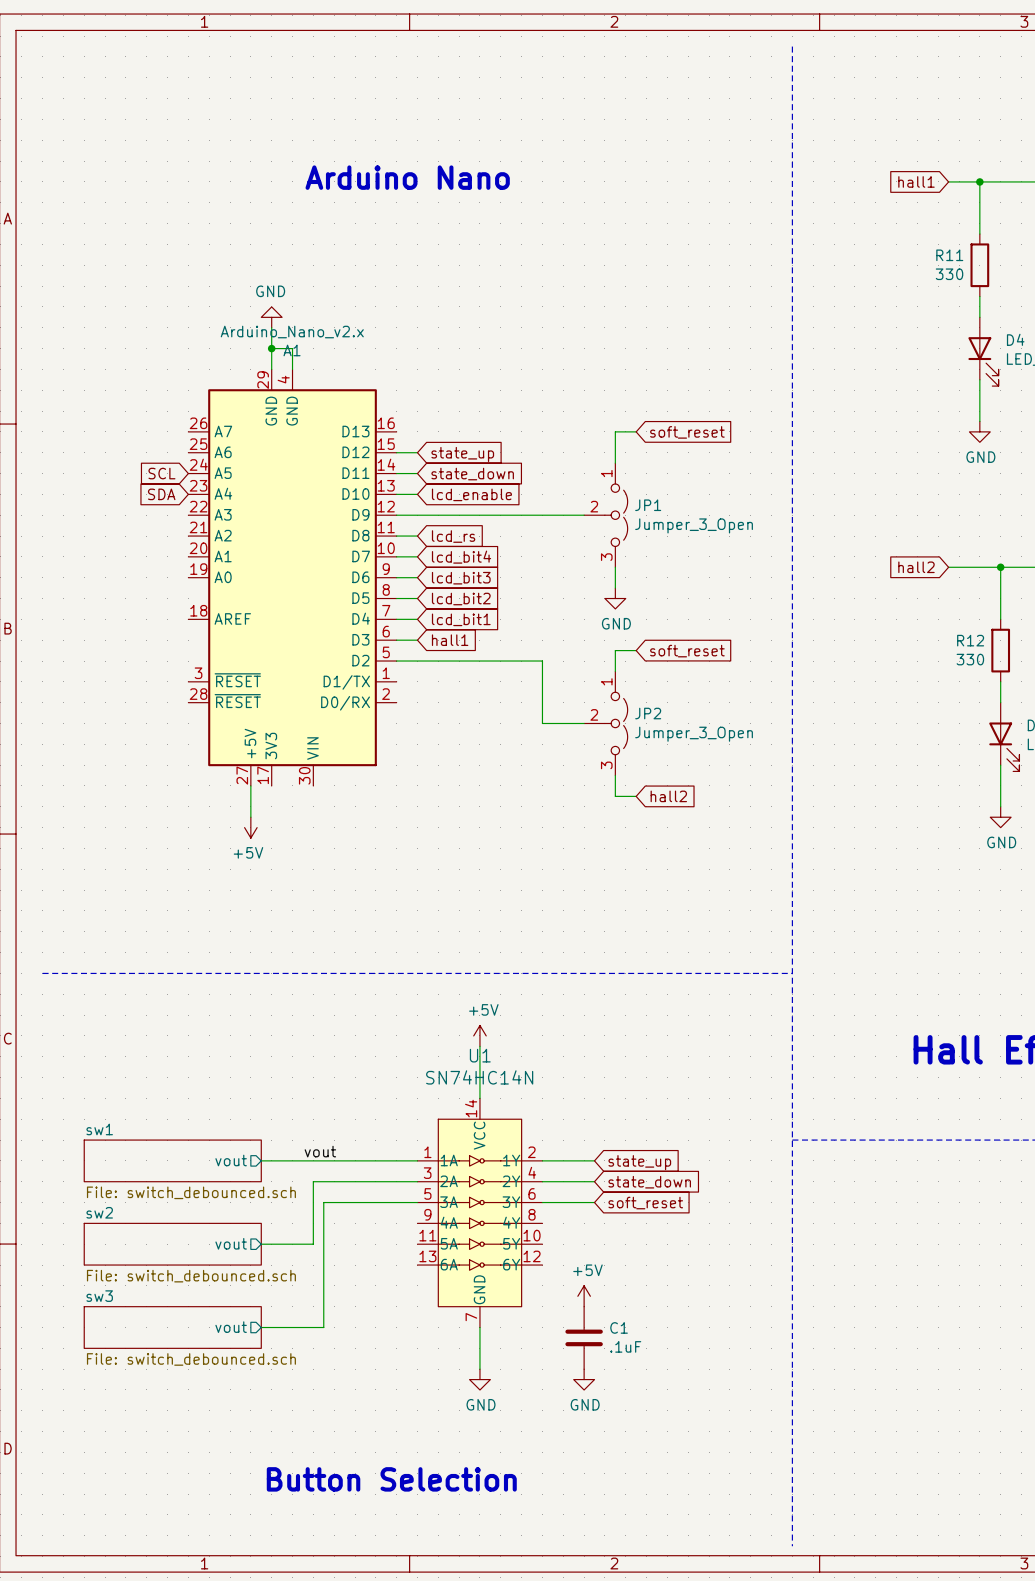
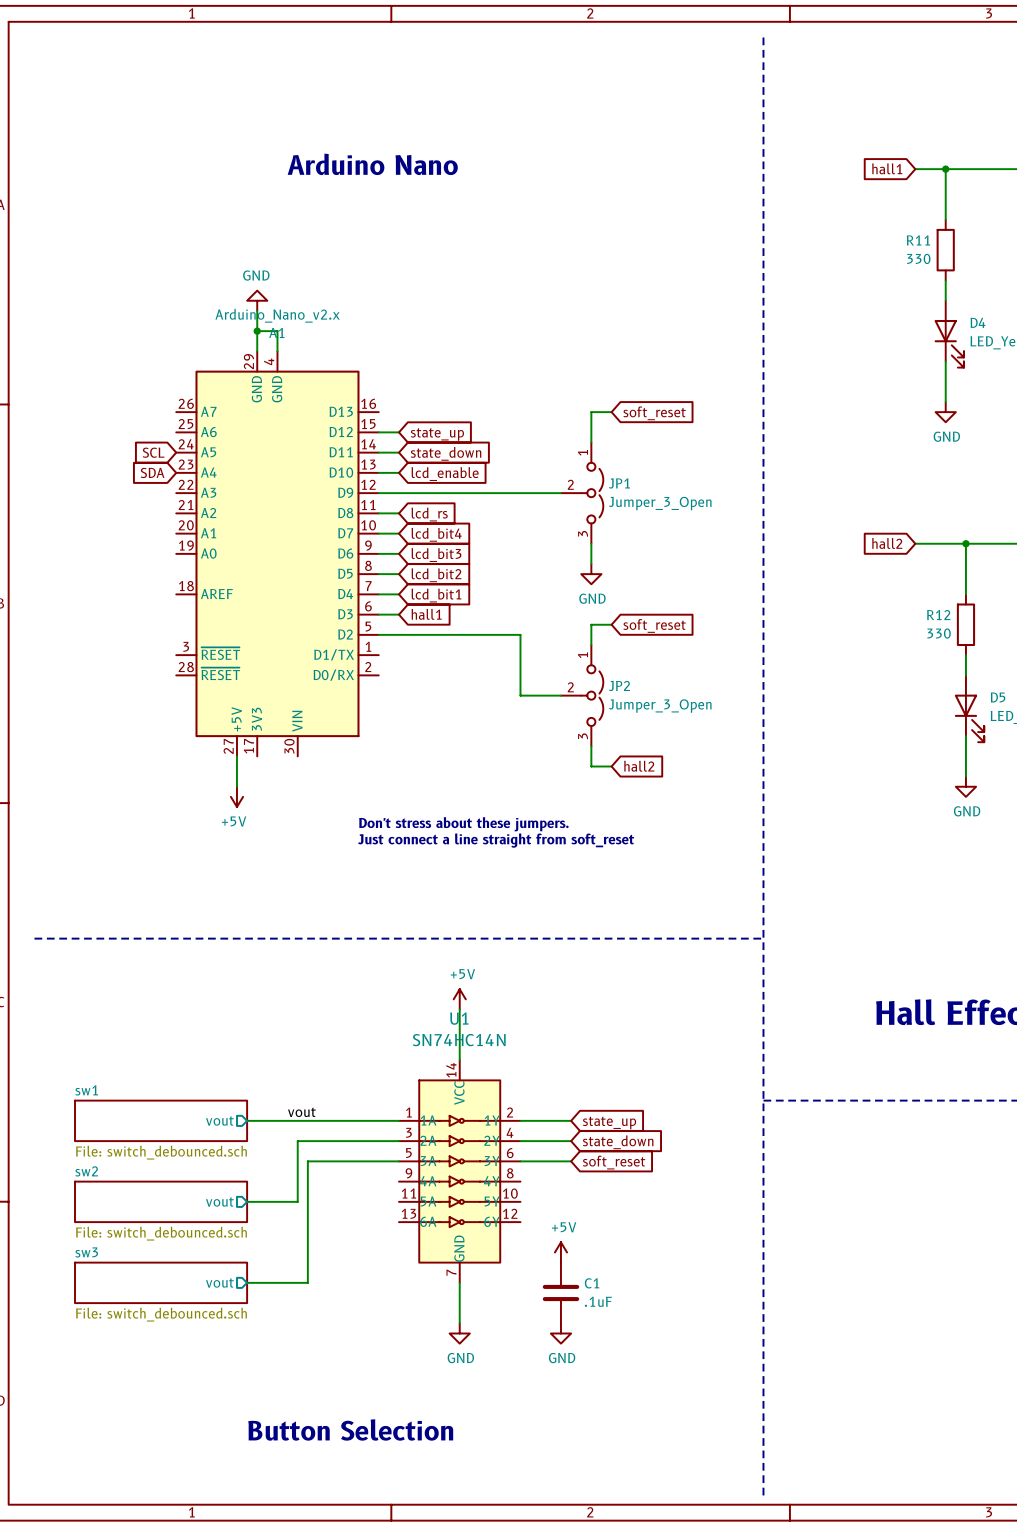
text: none -> Don't stress about these jumpers. (463, 824)
text: none -> Just connect a line straight from soft_reset (496, 840)

